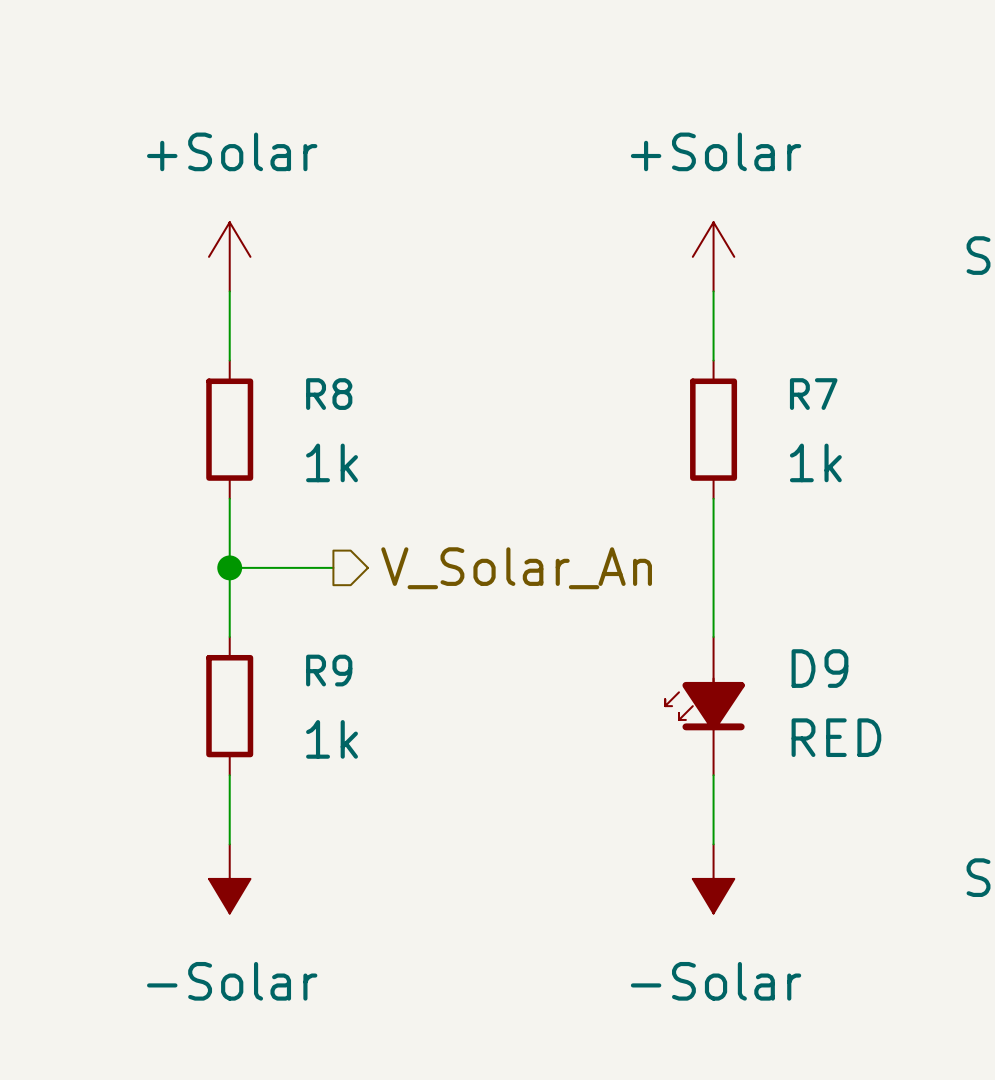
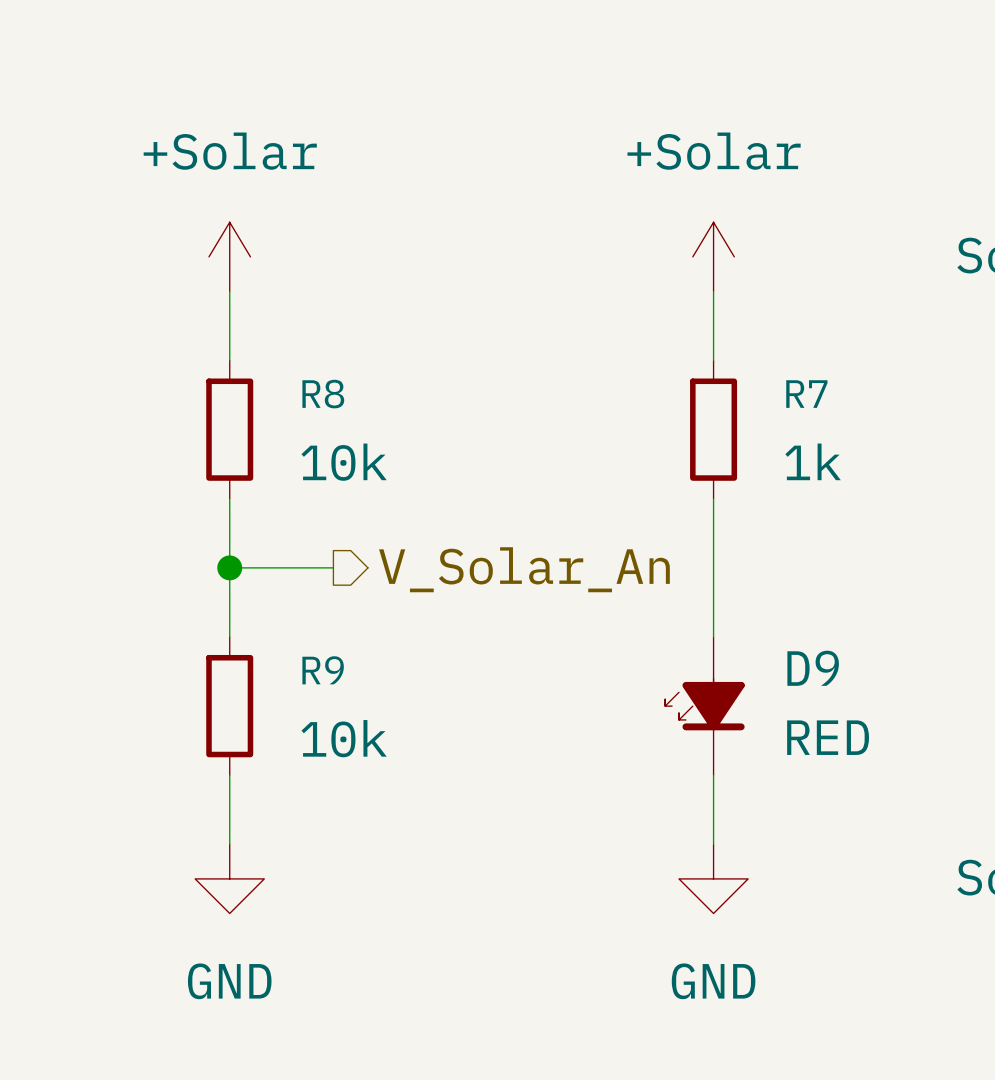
R8 value: 1k (332, 462) -> 10k (344, 462)
R9 value: 1k (332, 739) -> 10k (344, 738)
power symbol: -Solar (229, 878) -> GND (229, 878)
power symbol: -Solar (713, 878) -> GND (713, 878)

